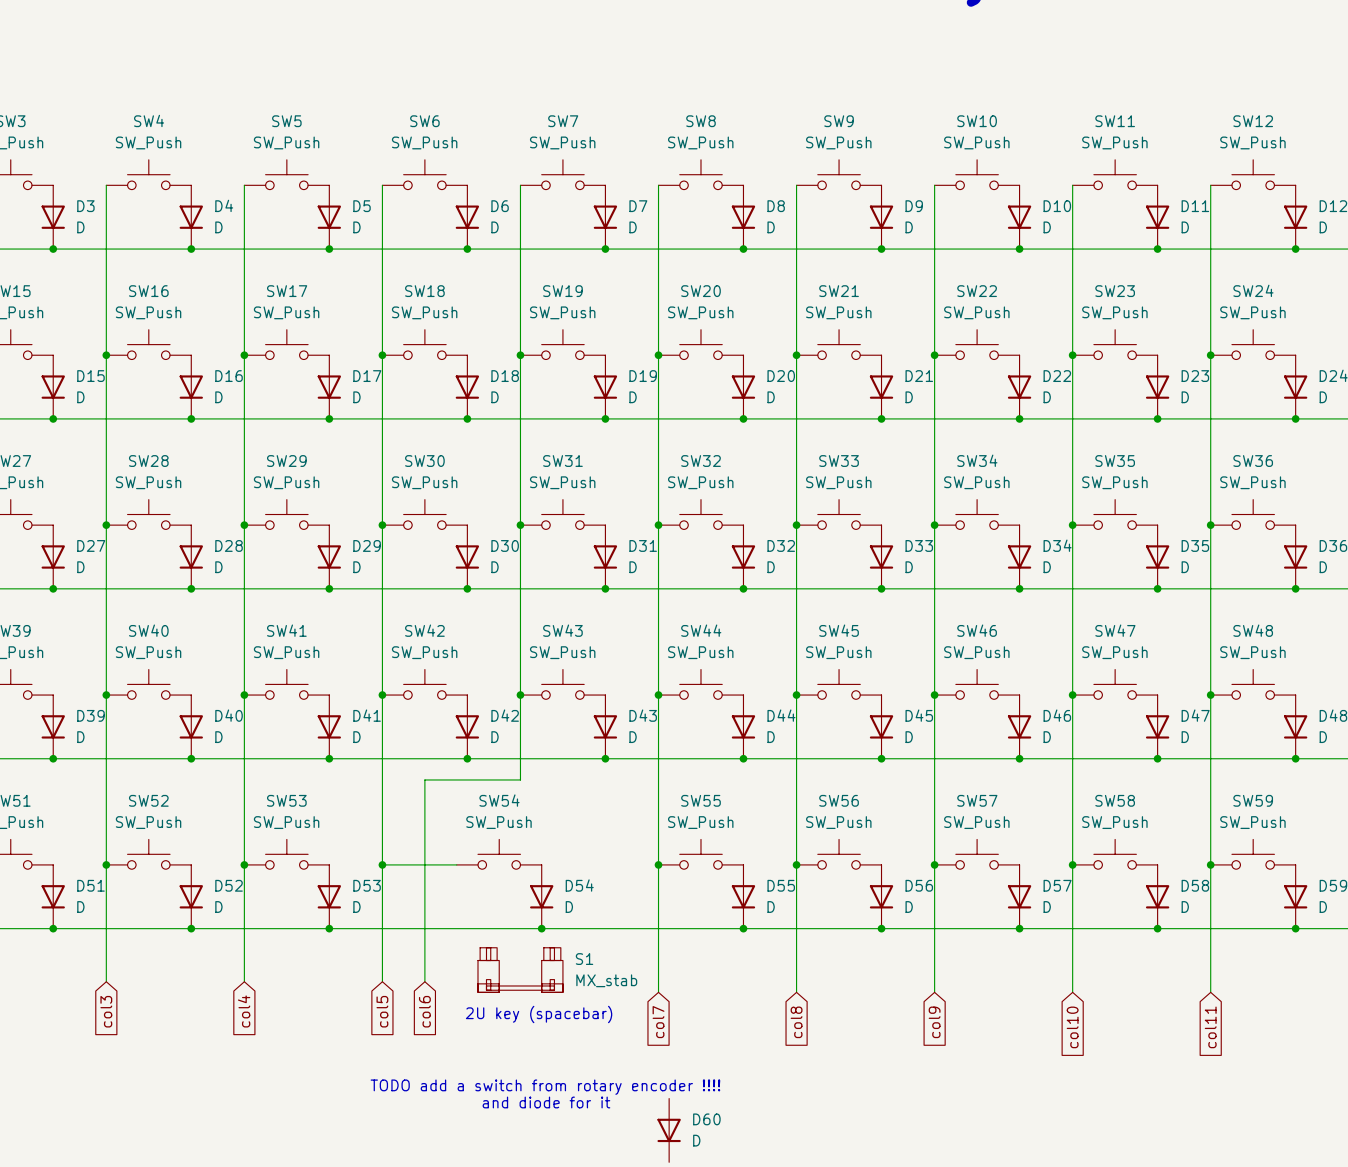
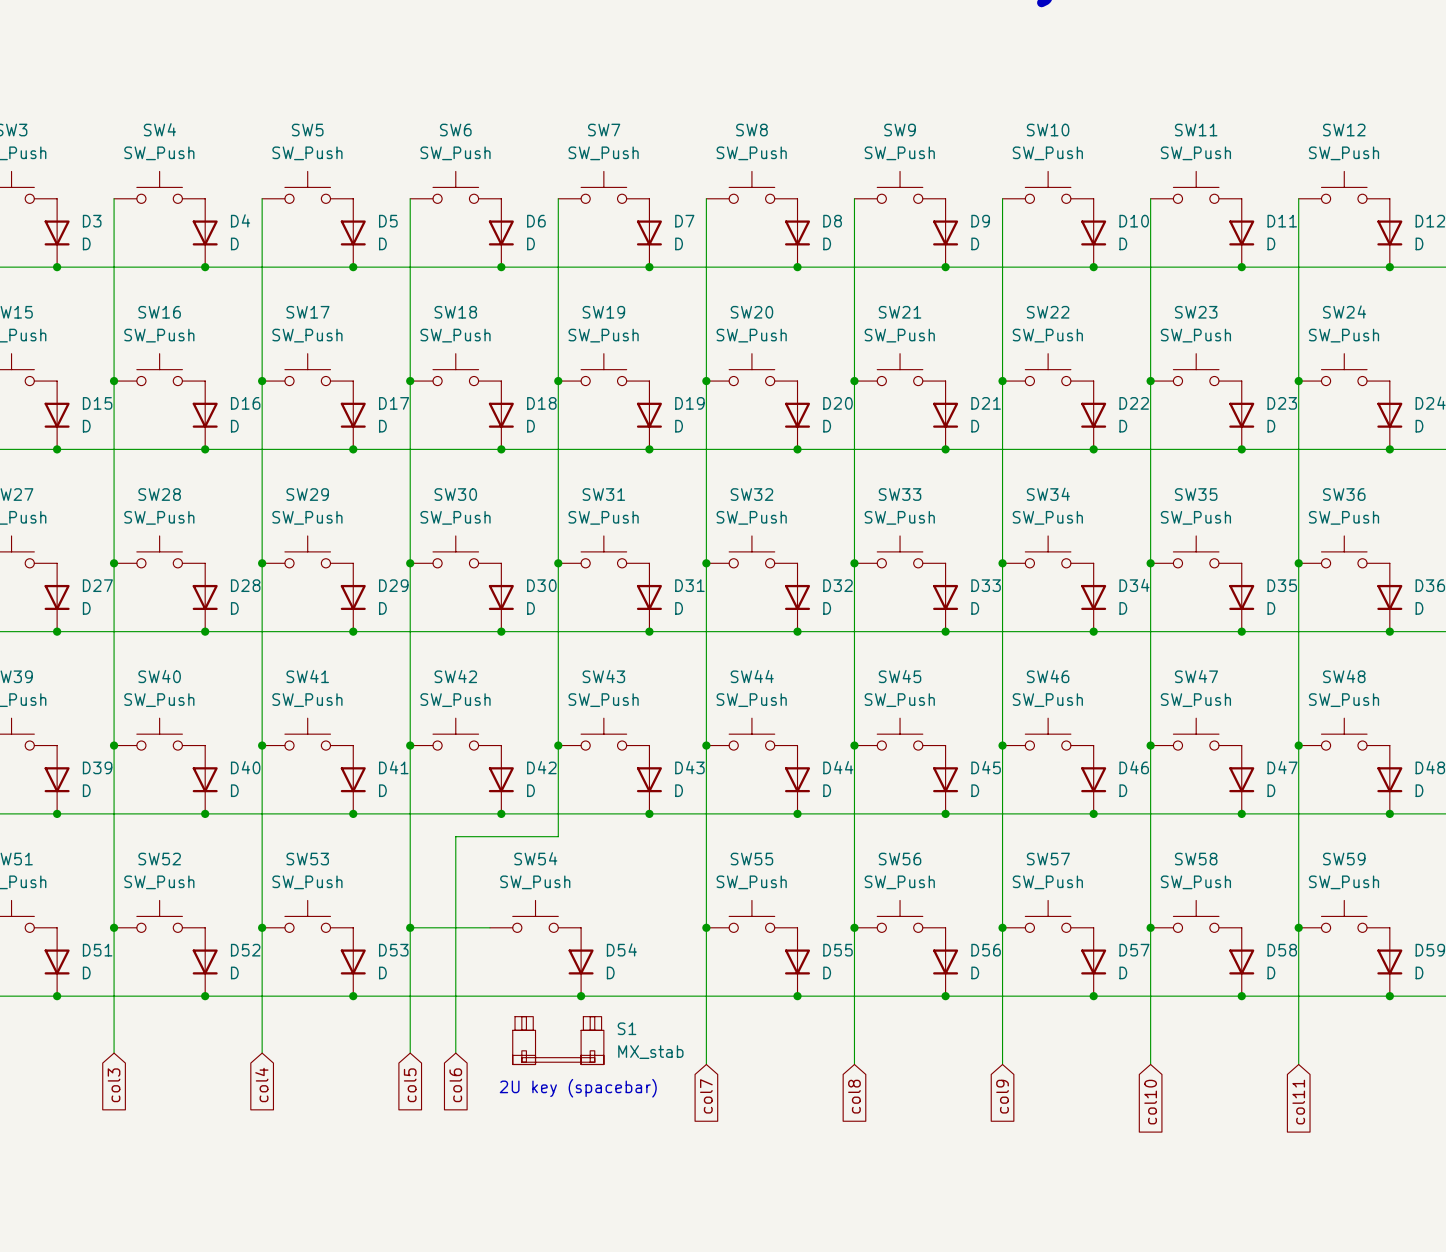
text: TODO add a switch from rotary encoder !!!! (545, 1087) -> none
text: and diode for it (546, 1102) -> none
D60: D (669, 1130) -> none

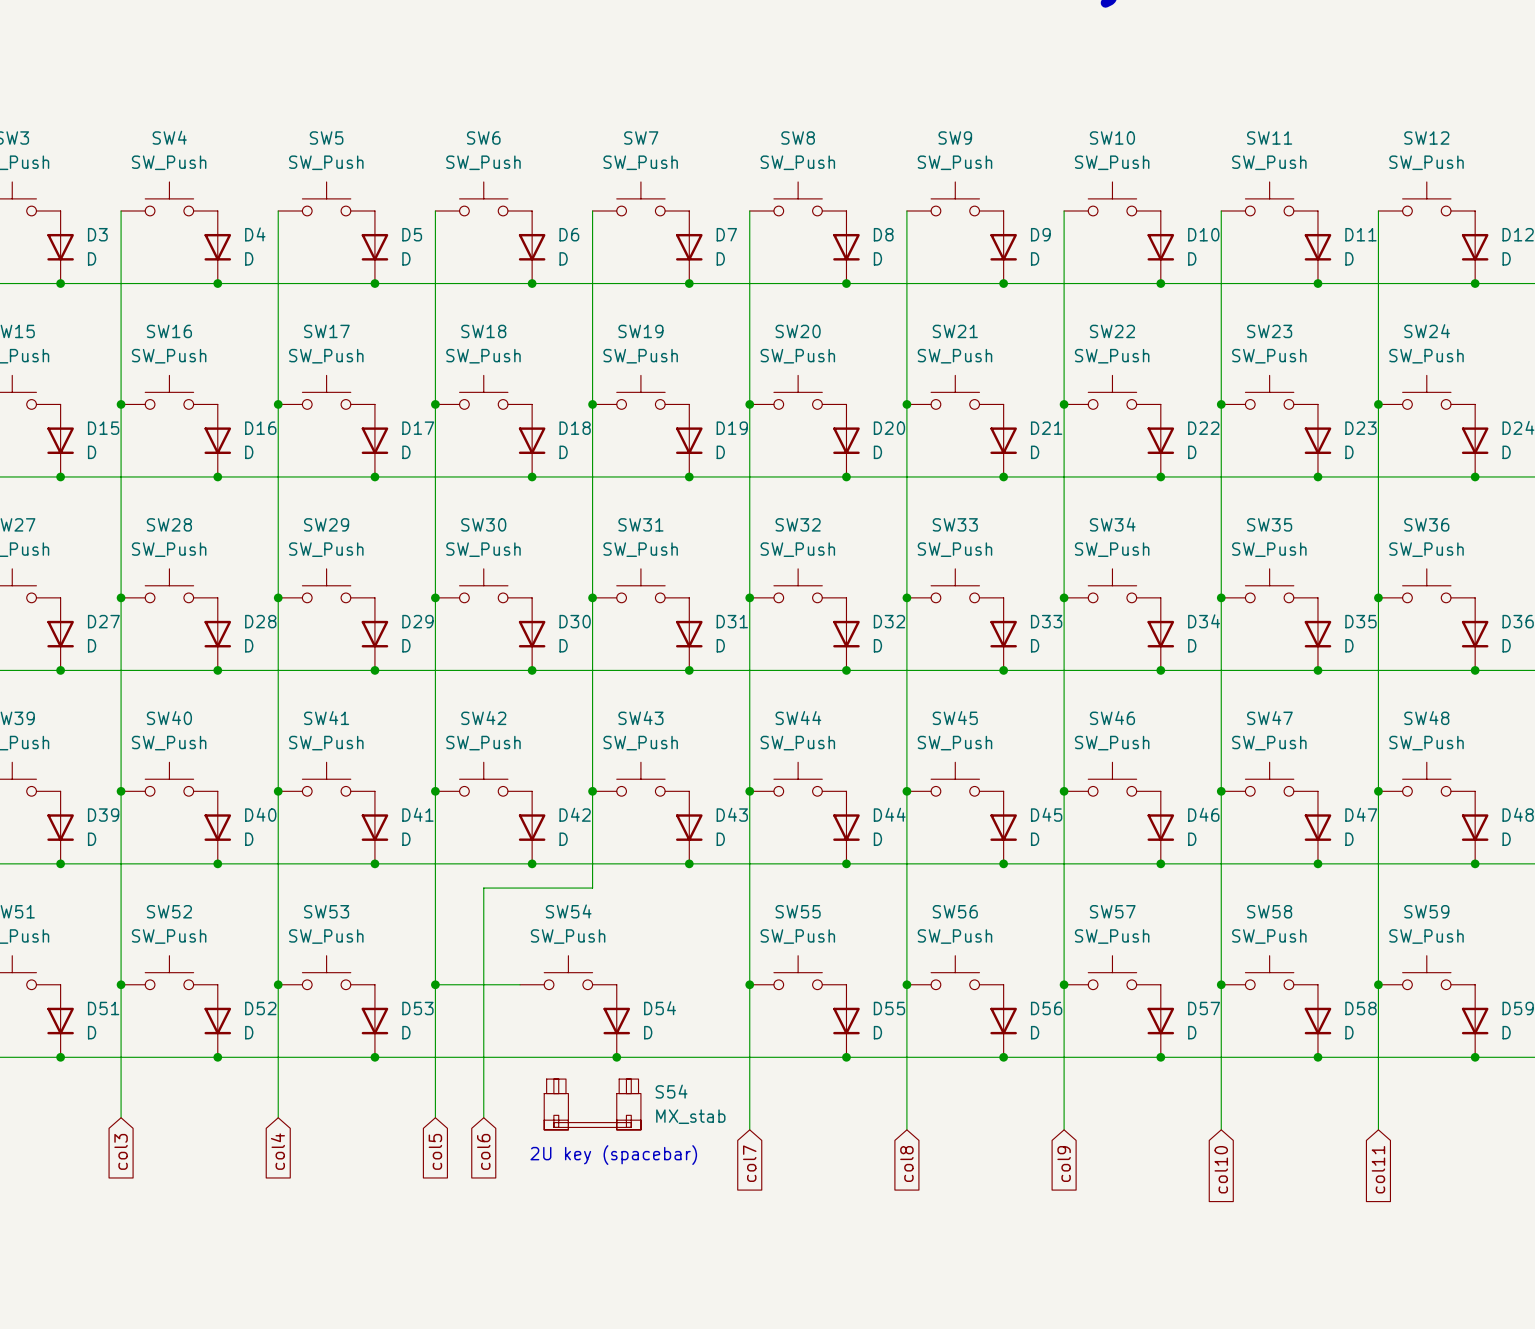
S1 name: S1 (627, 1028) -> S54 (671, 1091)

